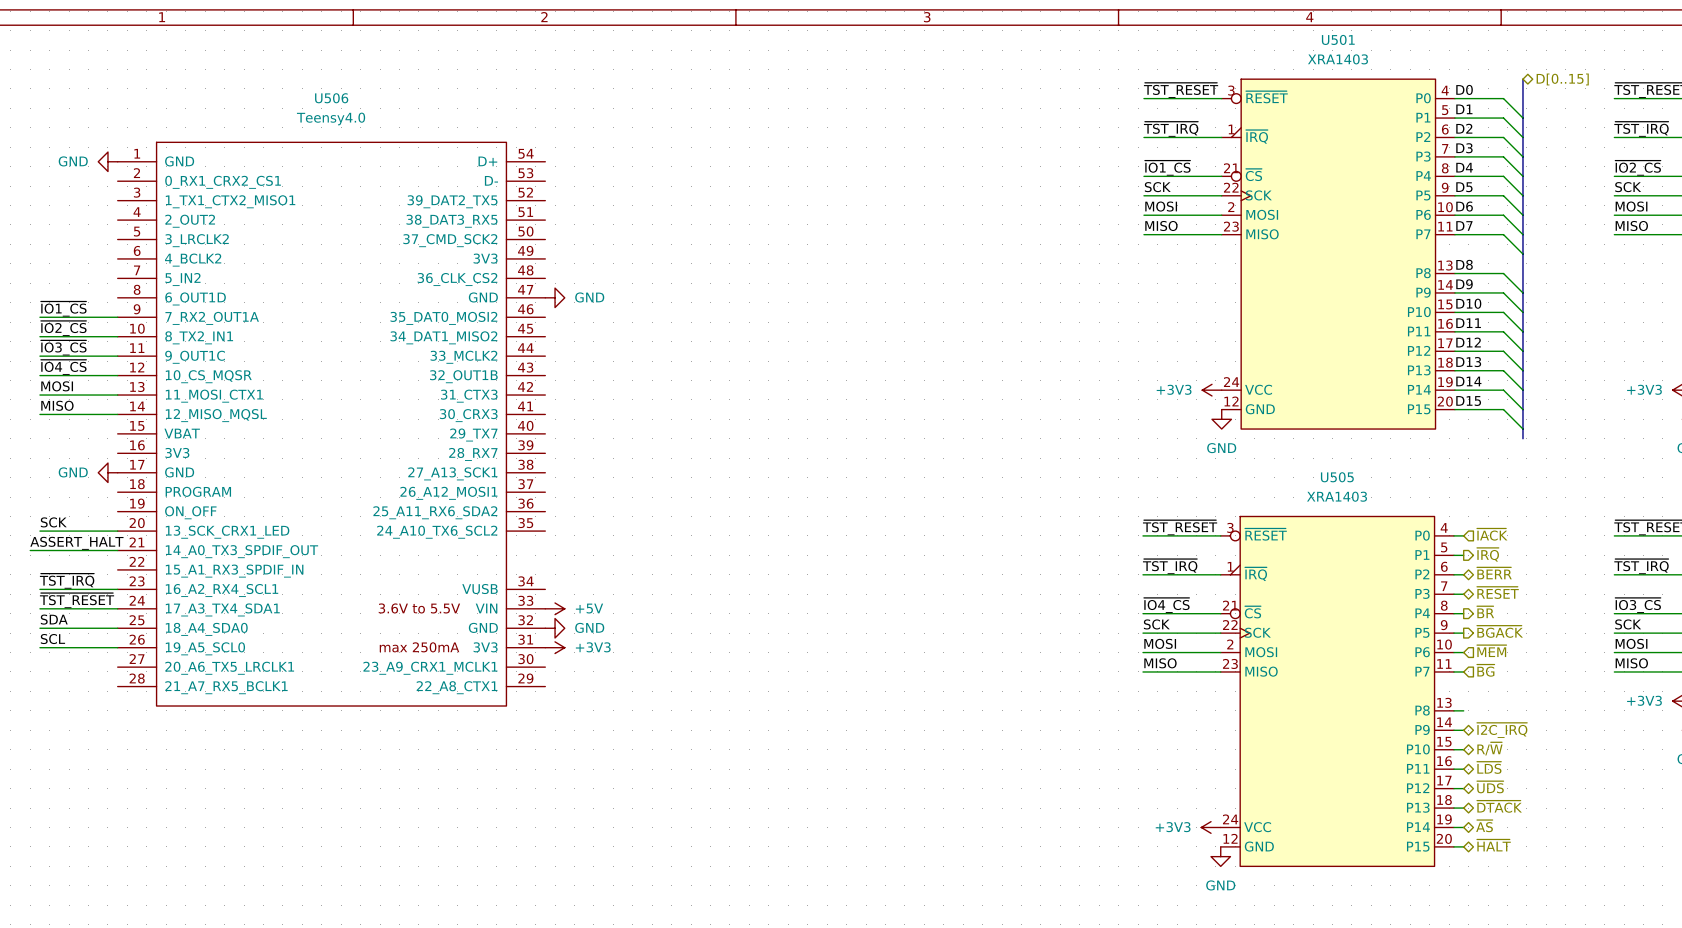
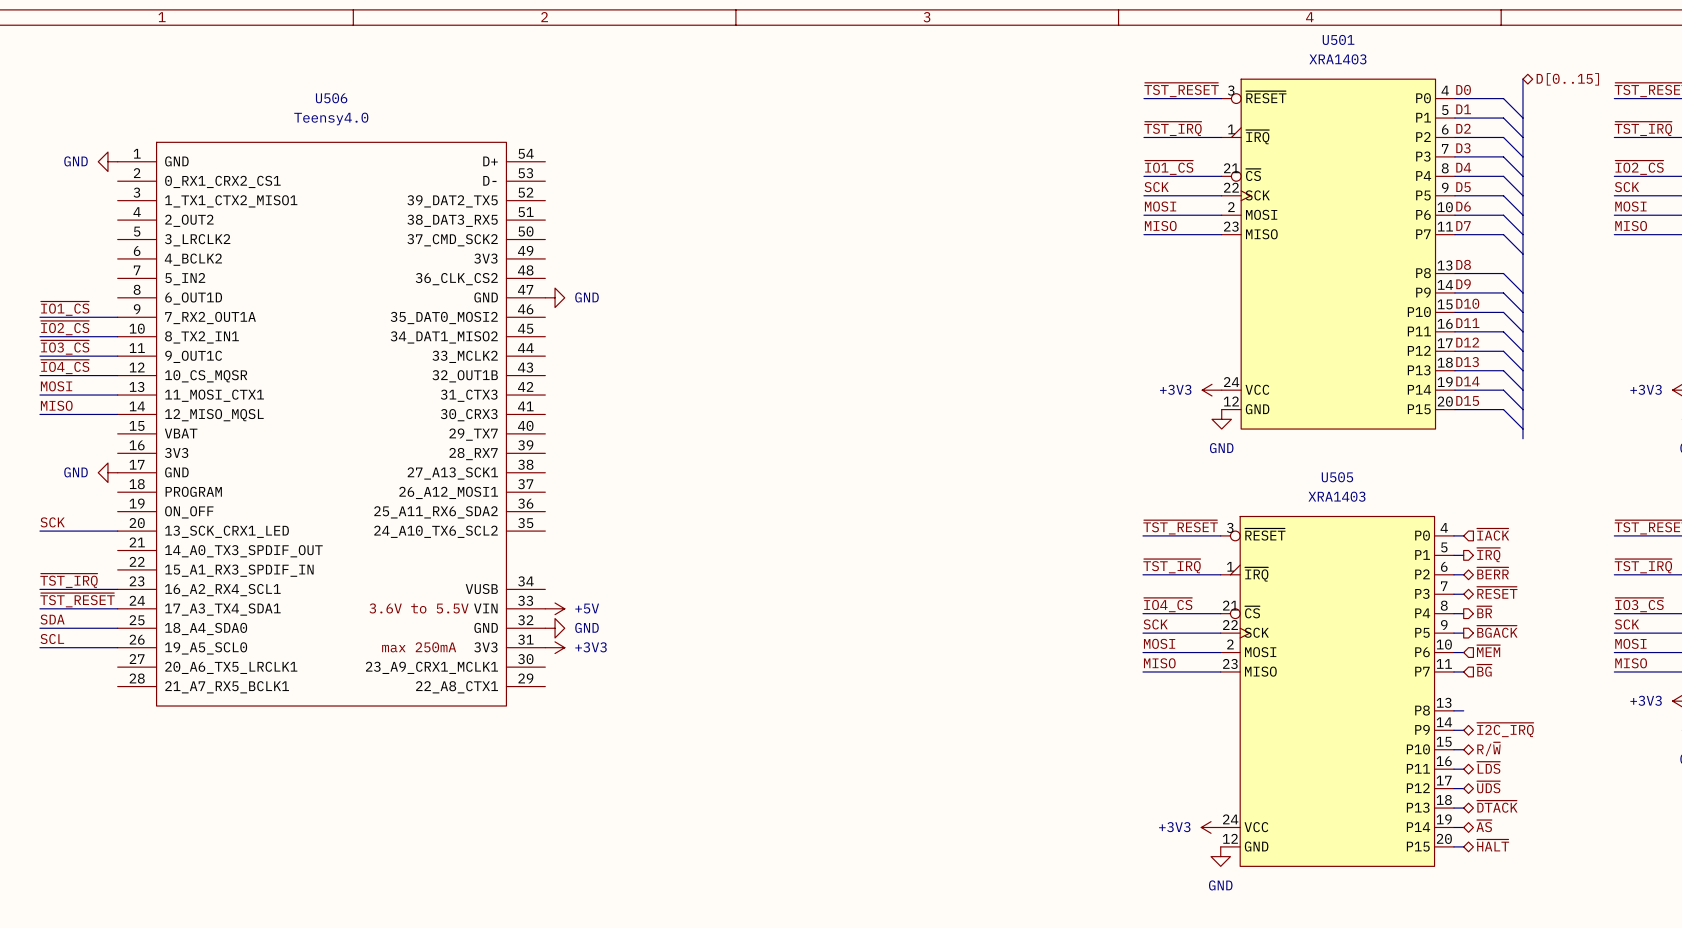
label: ASSERT_HALT (76, 543) -> none
wire: (30, 550) (117, 550) -> none

